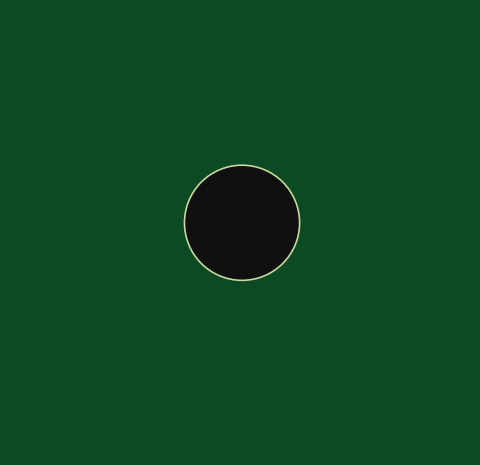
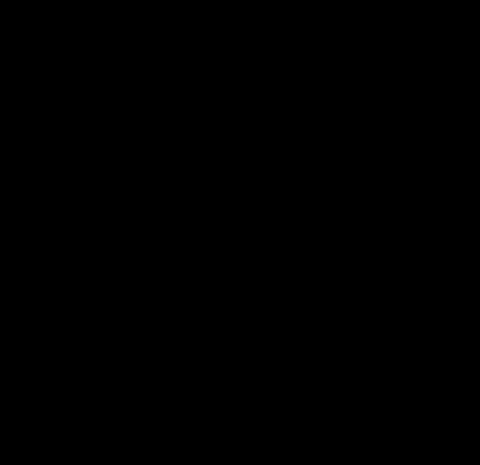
part: (242, 222) -> none

